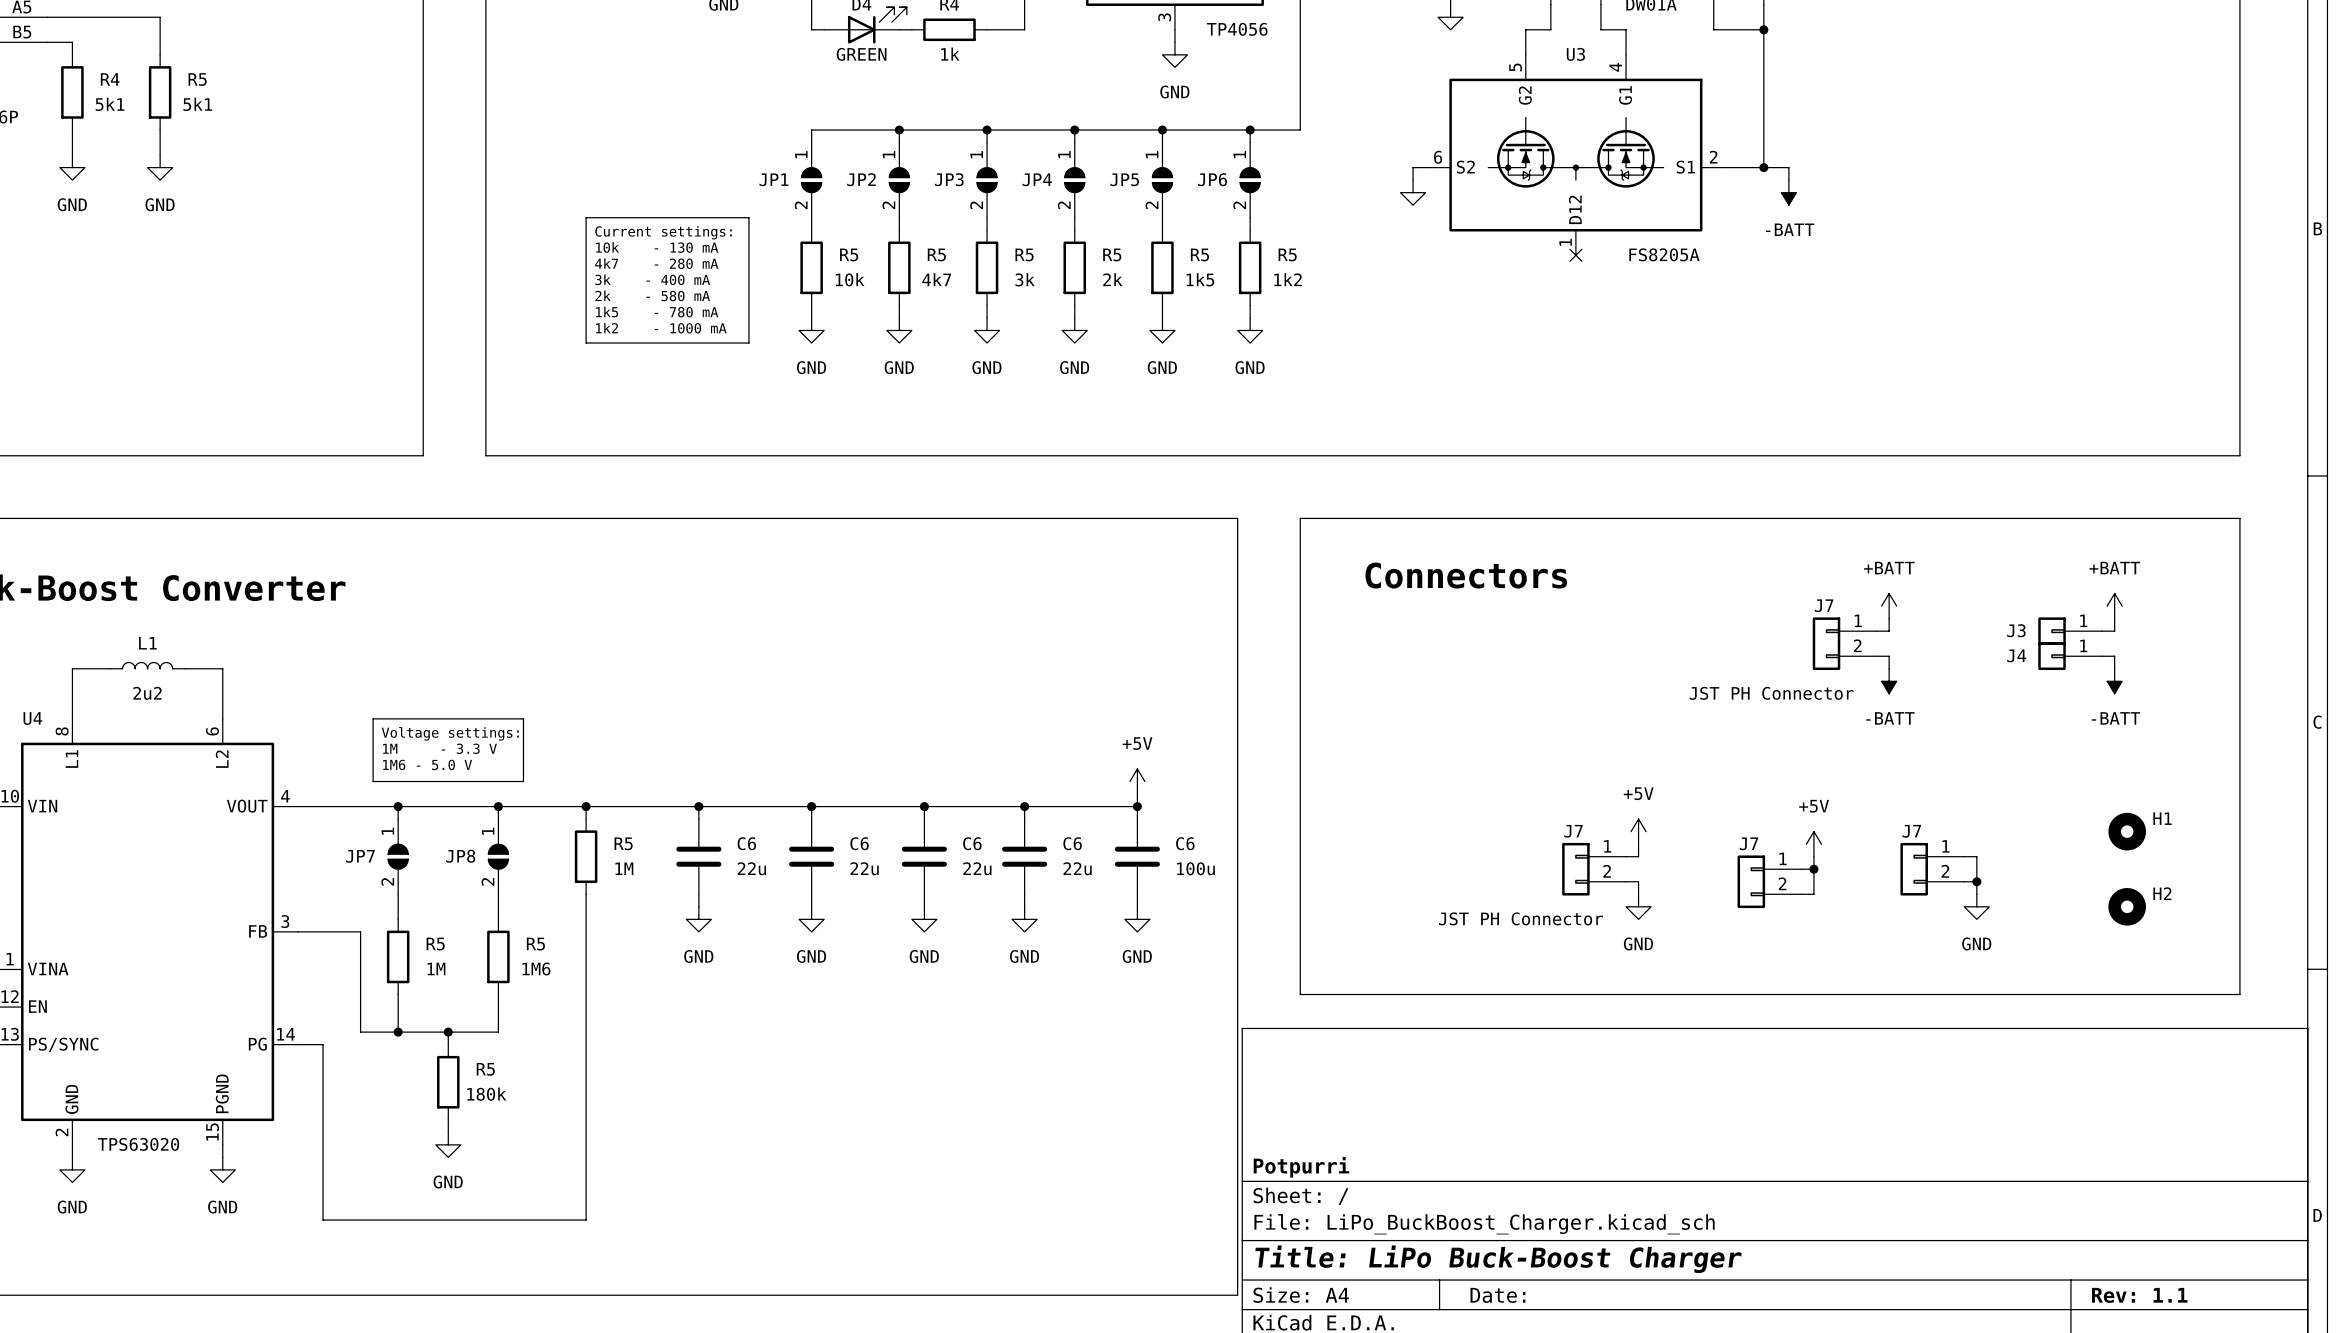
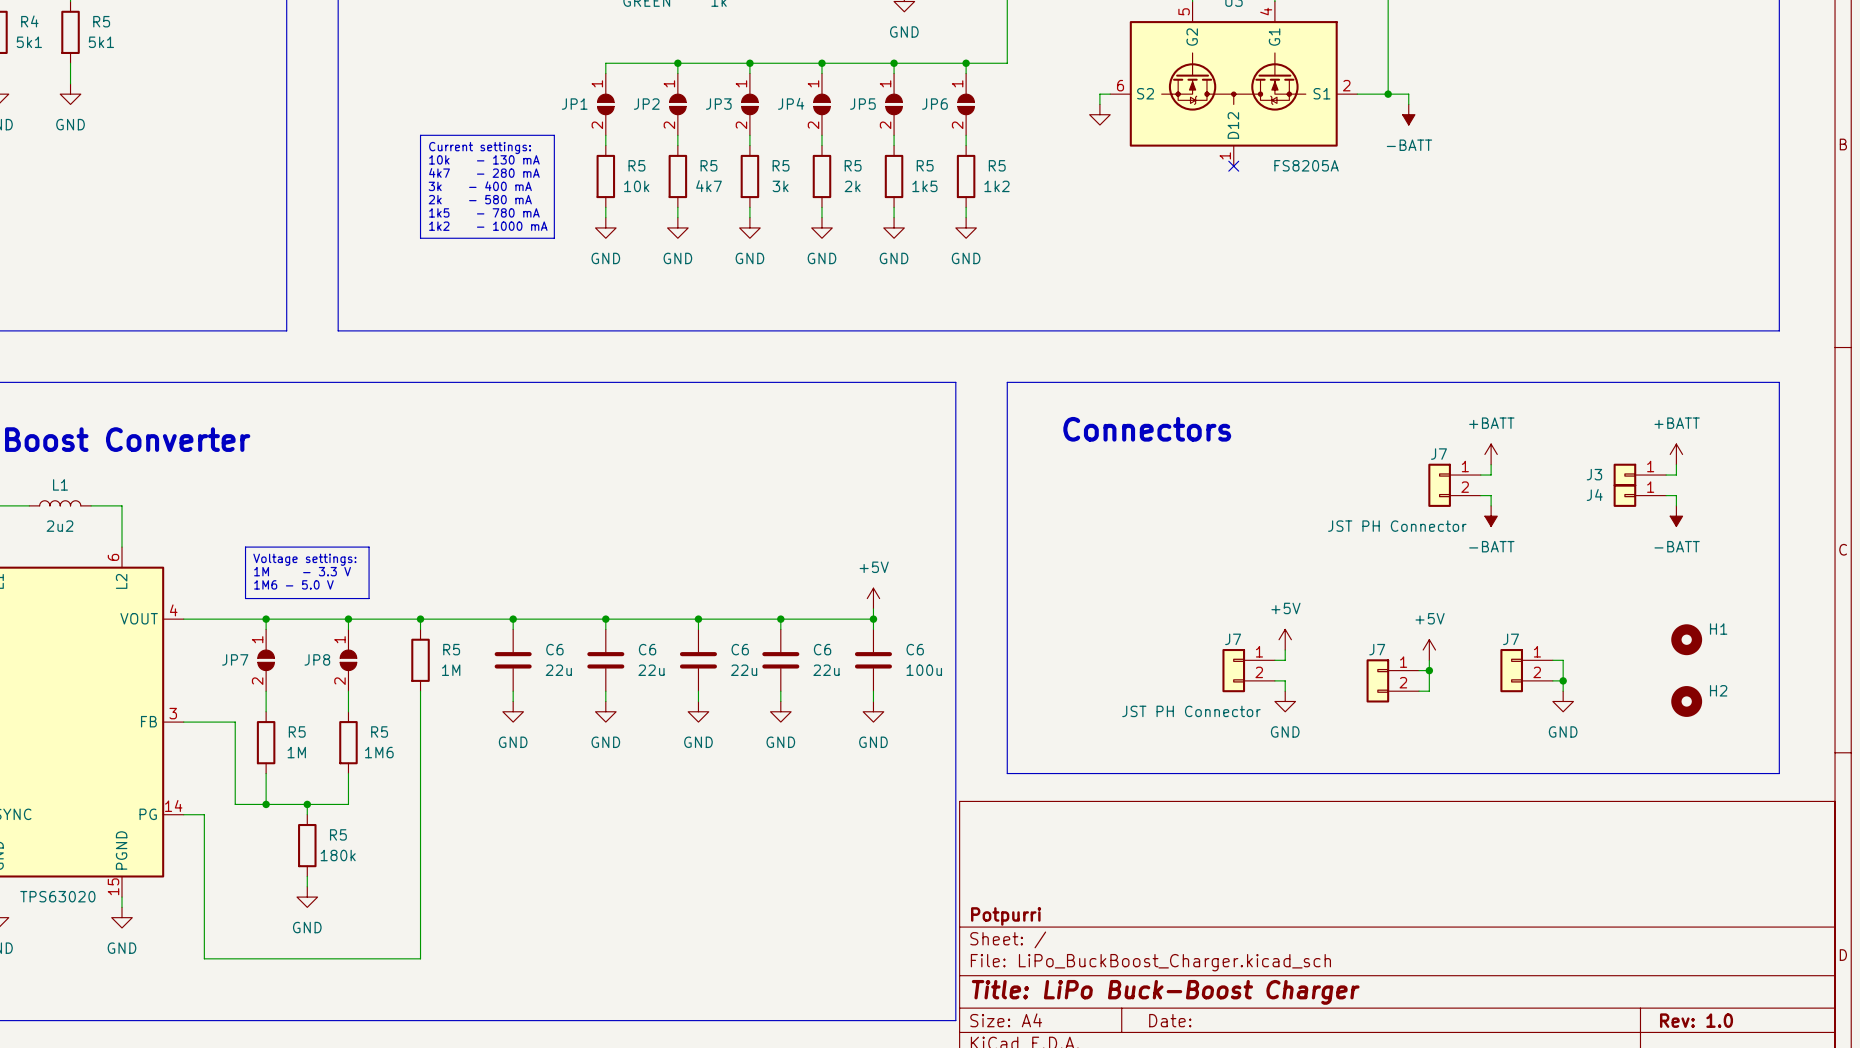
title block: Rev: 1.1 (2139, 1295) -> Rev: 1.0 (1696, 1020)

